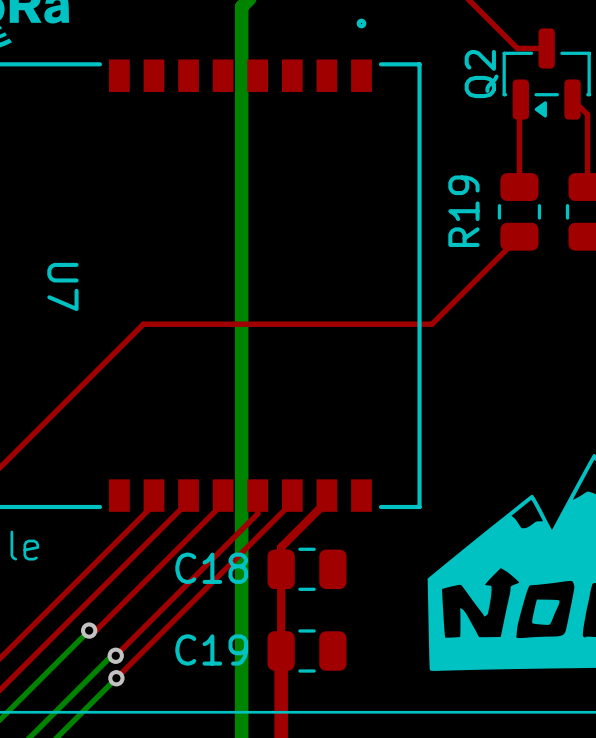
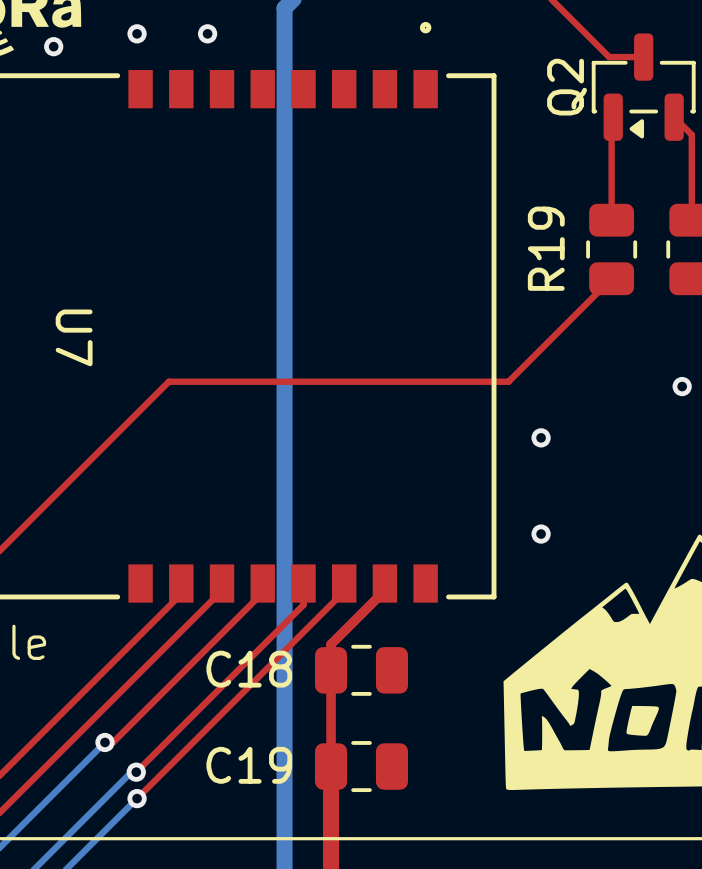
via: none -> (137, 33)
via: none -> (207, 33)
via: none -> (53, 46)
via: none -> (682, 386)
via: none -> (541, 437)
via: none -> (541, 534)

